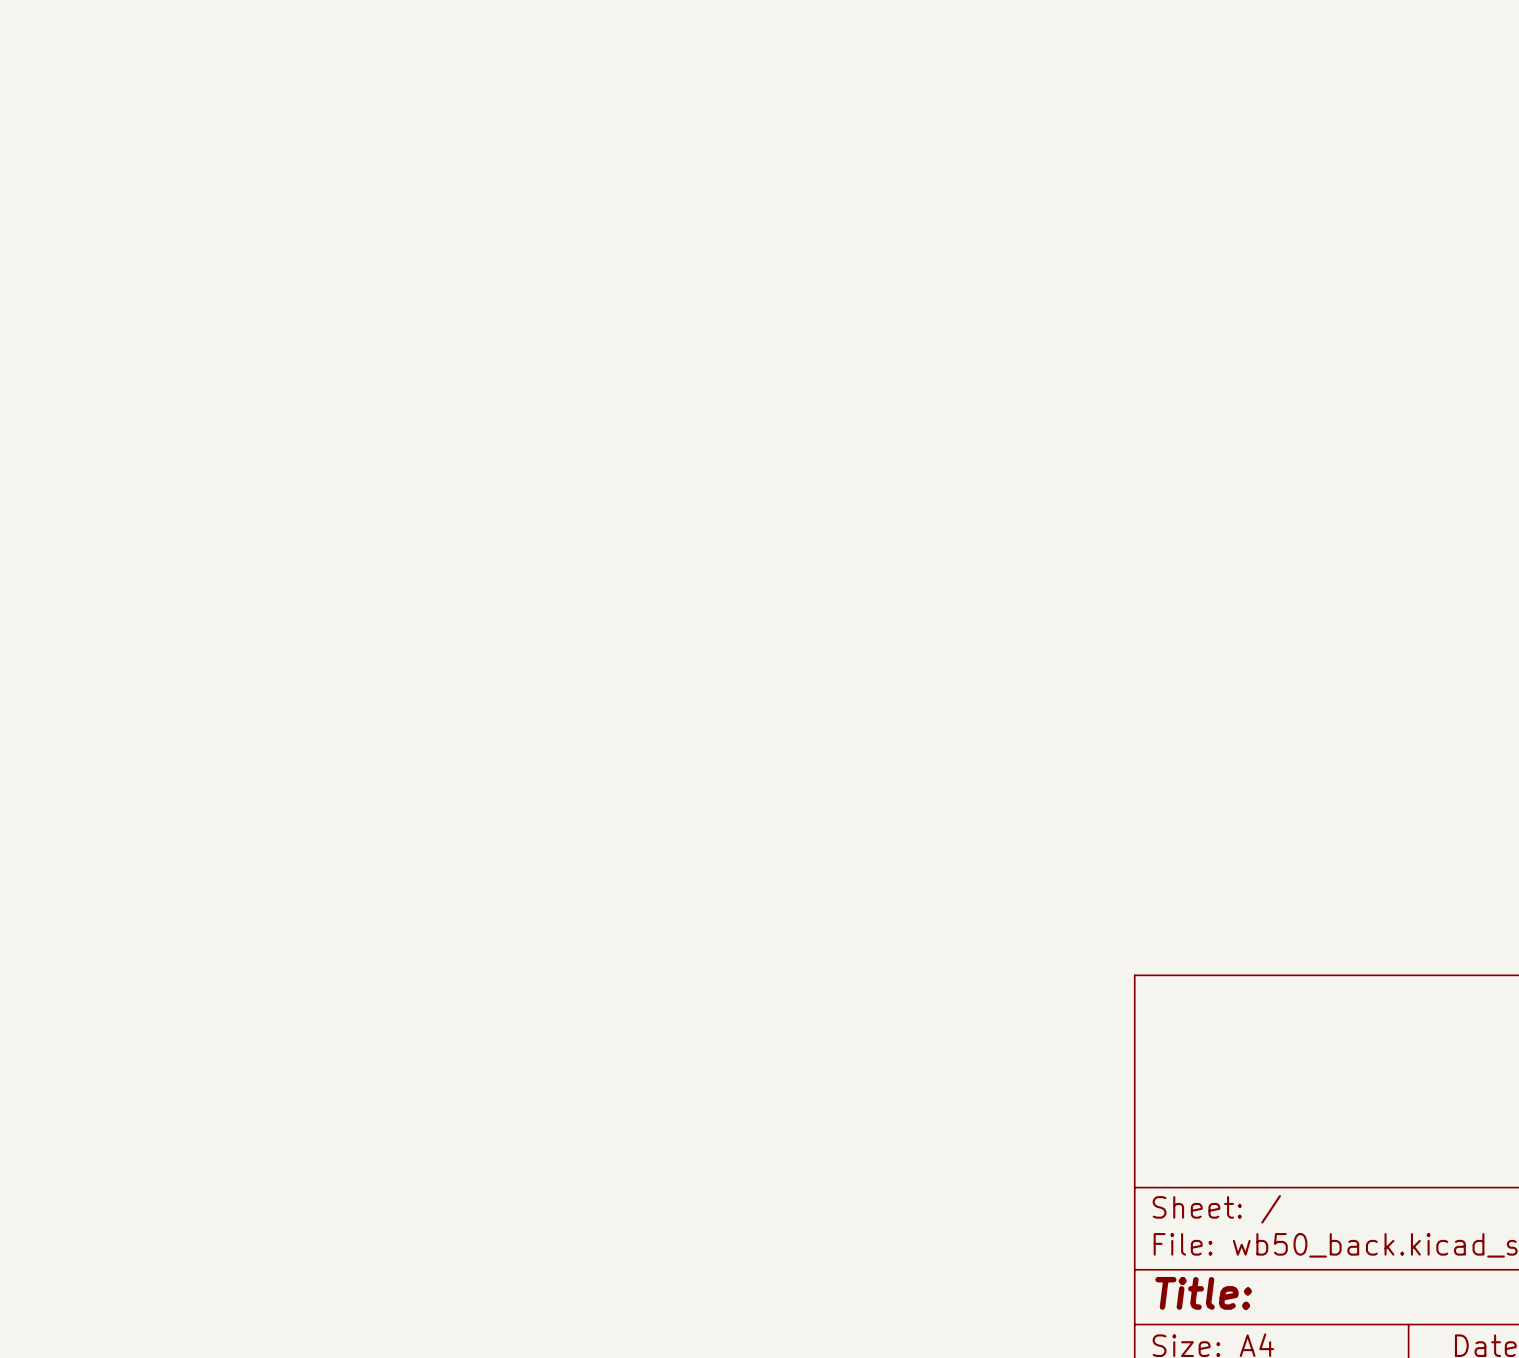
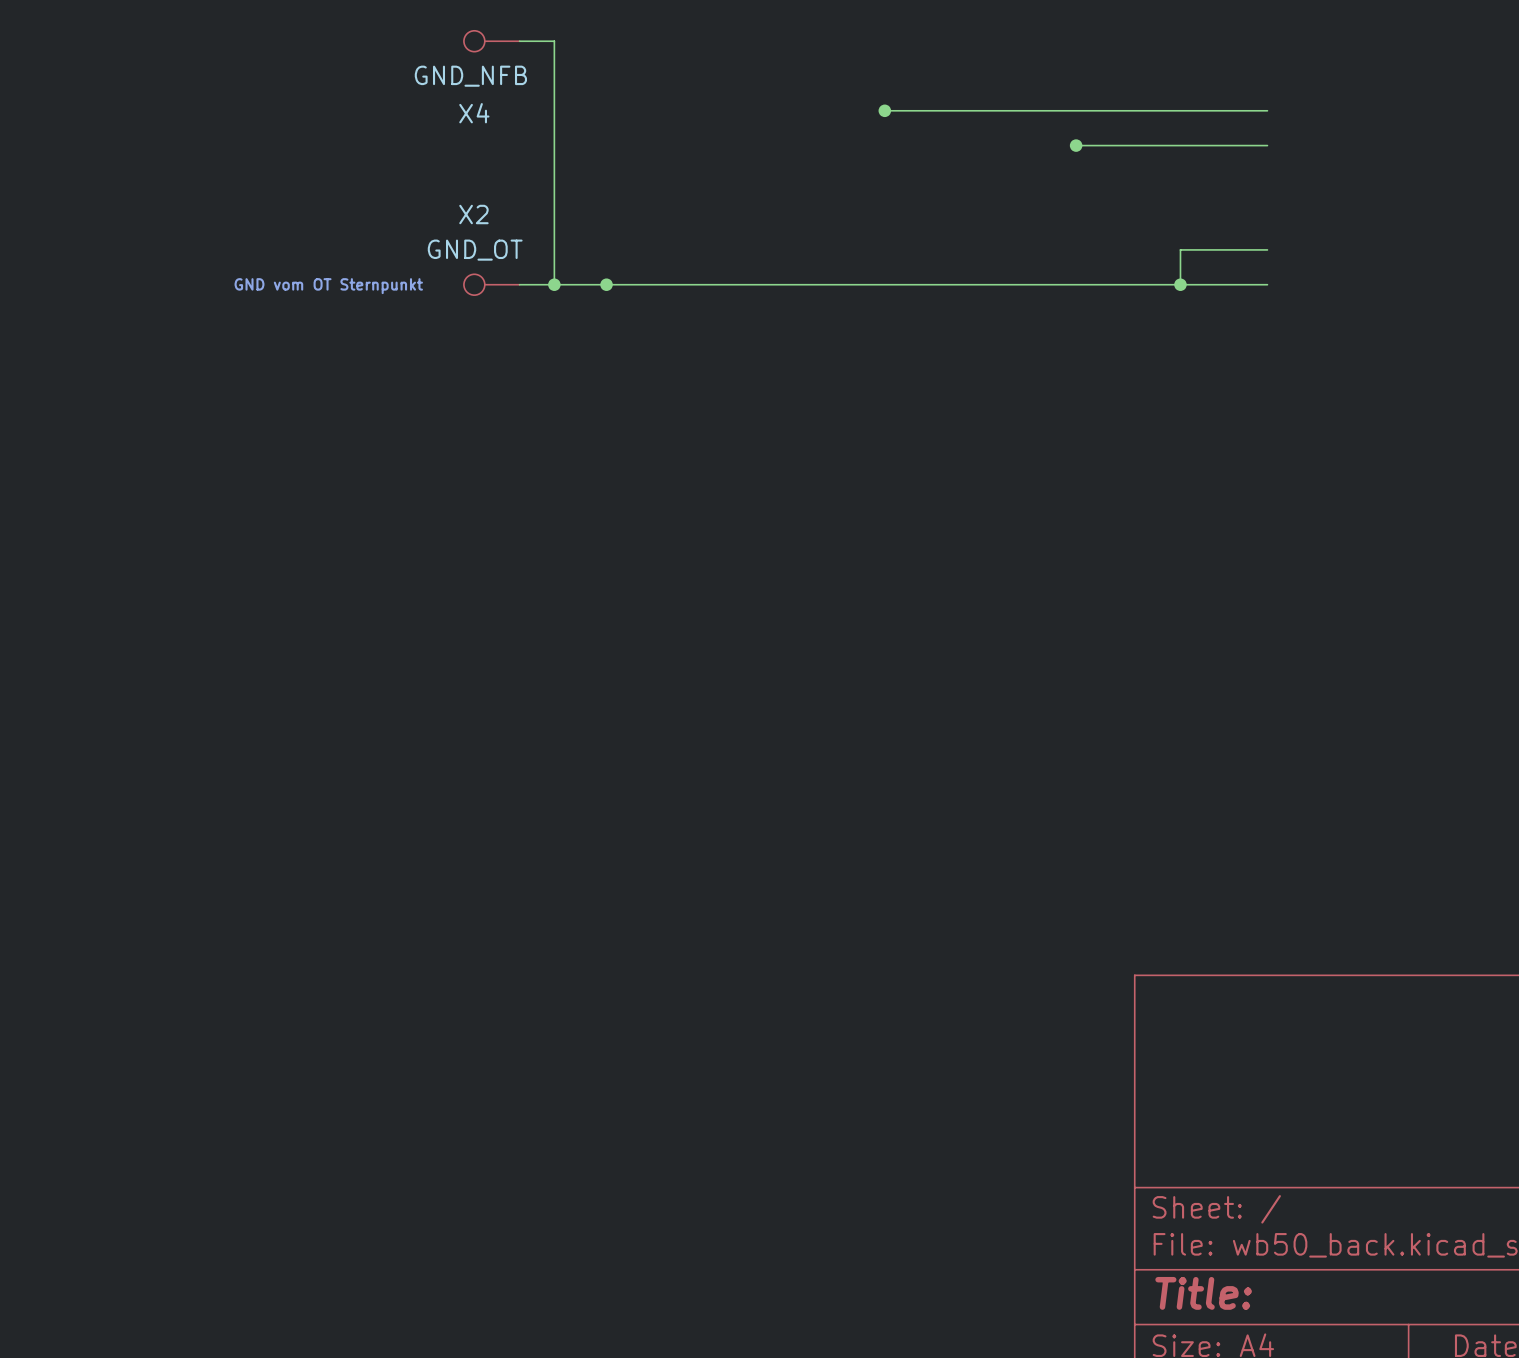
X4: none -> GND_NFB (491, 41)
wire: none -> (519, 41) (554, 41) (554, 284)
wire: none -> (884, 110) (1267, 110)
junction: none -> (884, 110)
wire: none -> (1076, 145) (1267, 145)
junction: none -> (1076, 145)
wire: none -> (1267, 249) (1180, 249) (1180, 284)
X2: none -> GND_OT (491, 284)
wire: none -> (519, 284) (1267, 284)
junction: none -> (554, 284)
junction: none -> (606, 284)
junction: none -> (1180, 284)
text: none -> GND vom OT Sternpunkt (328, 286)

